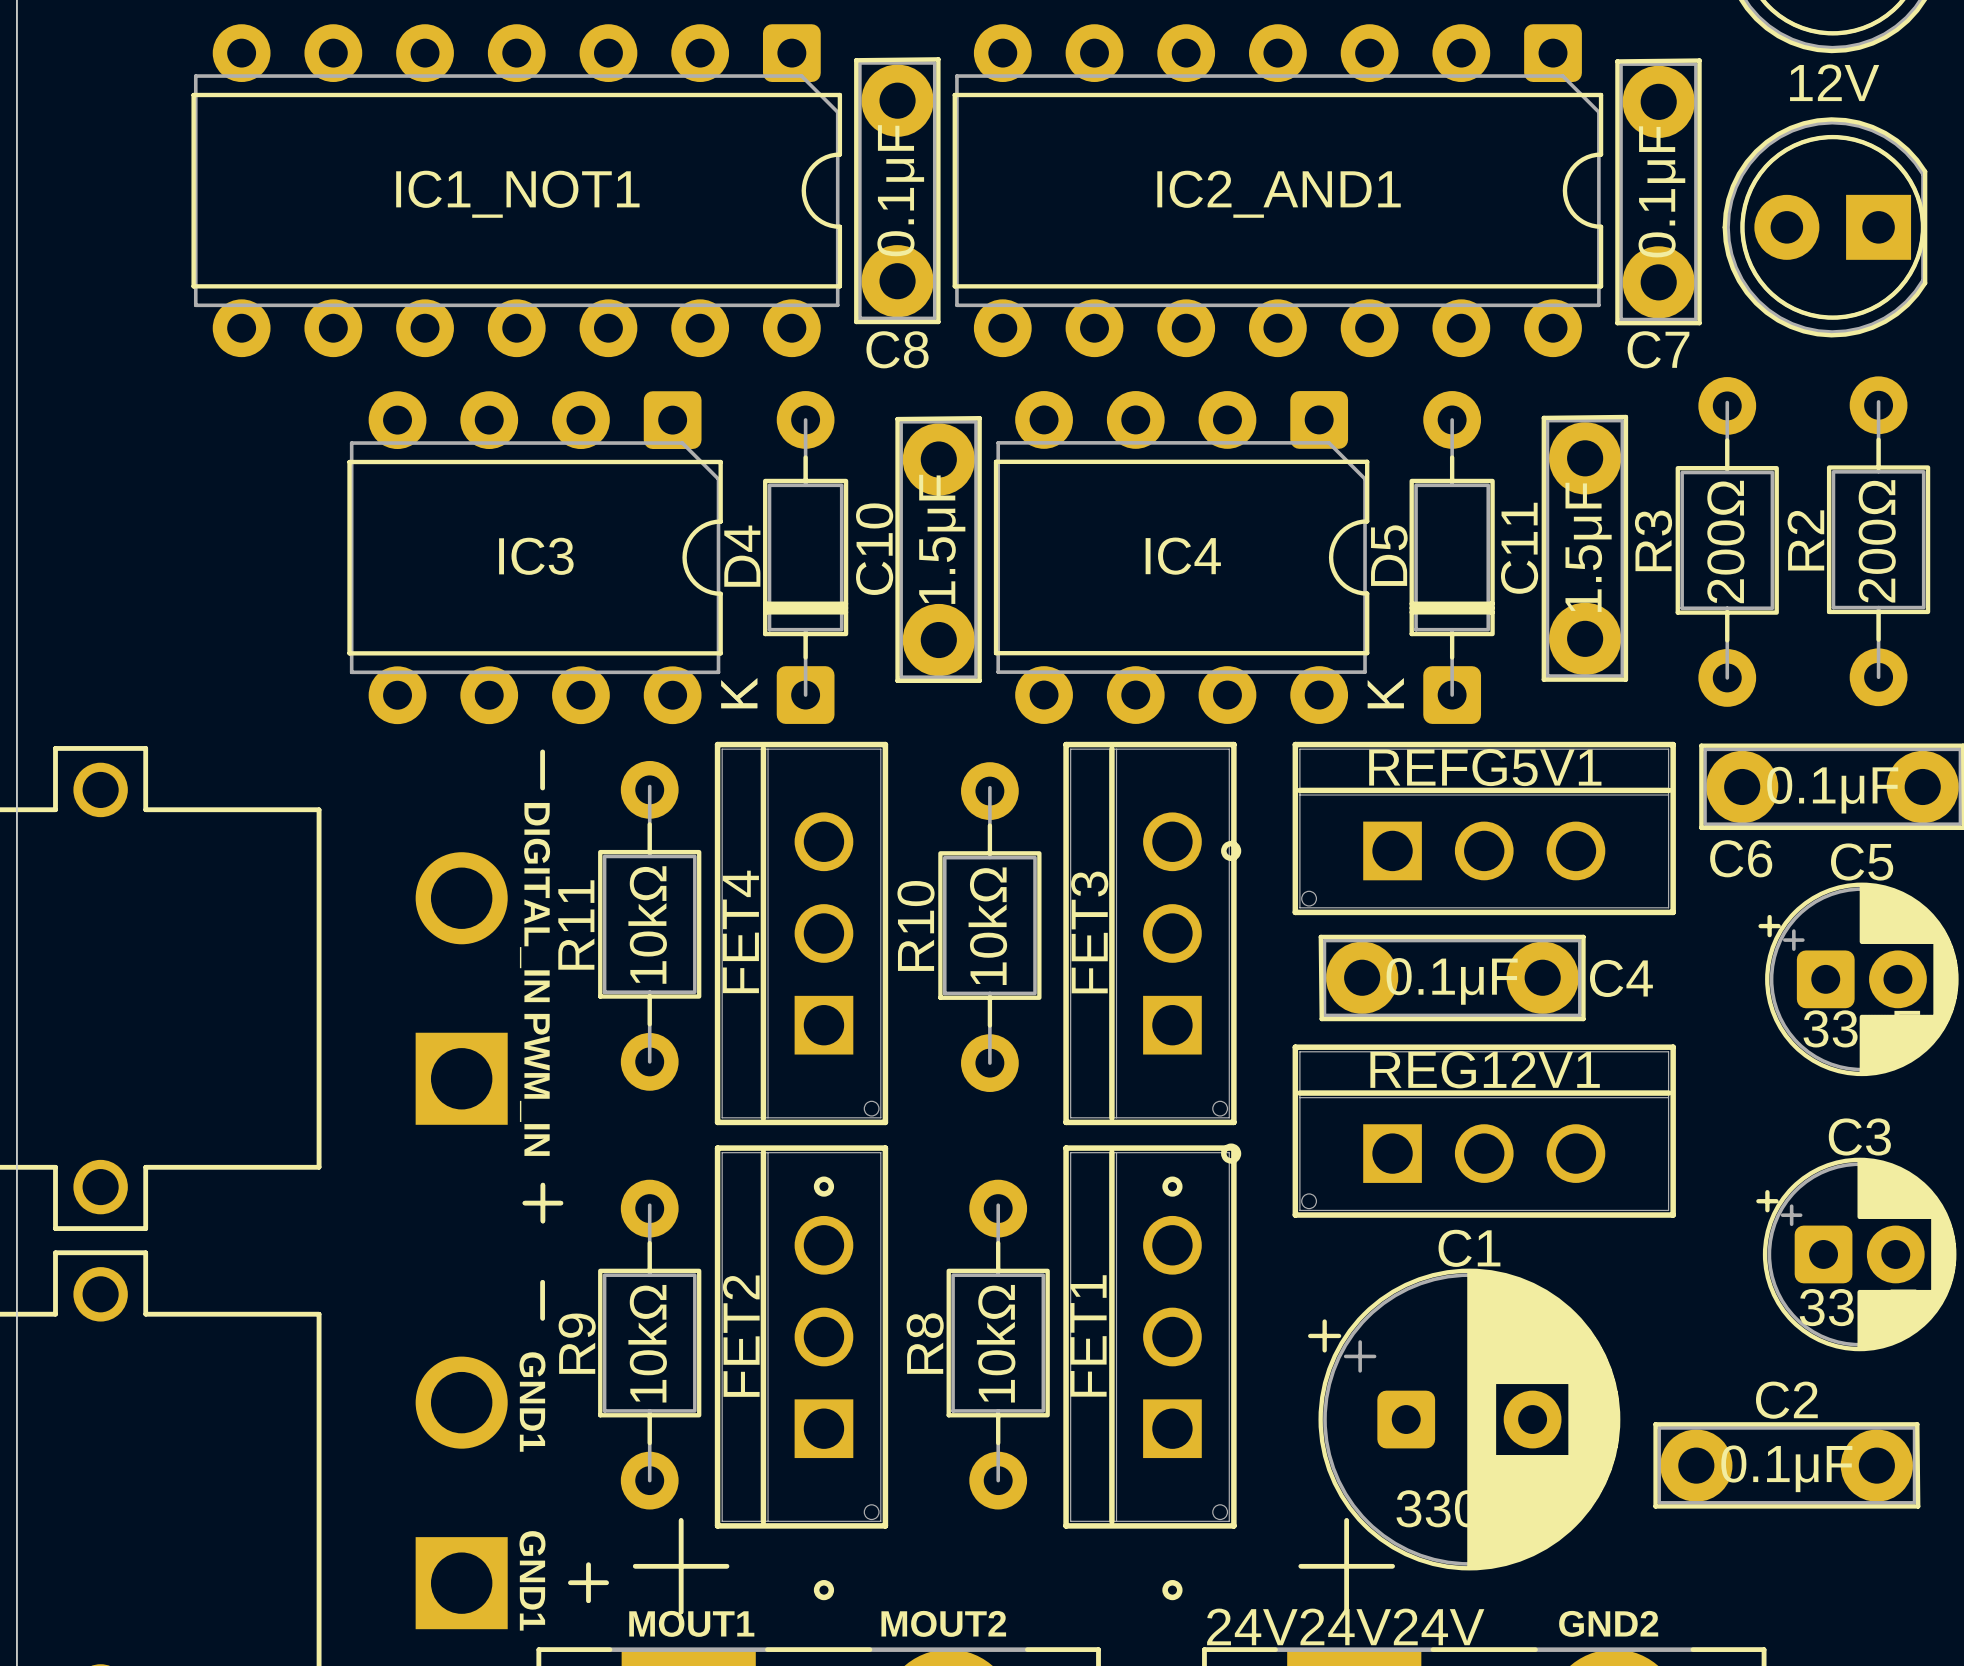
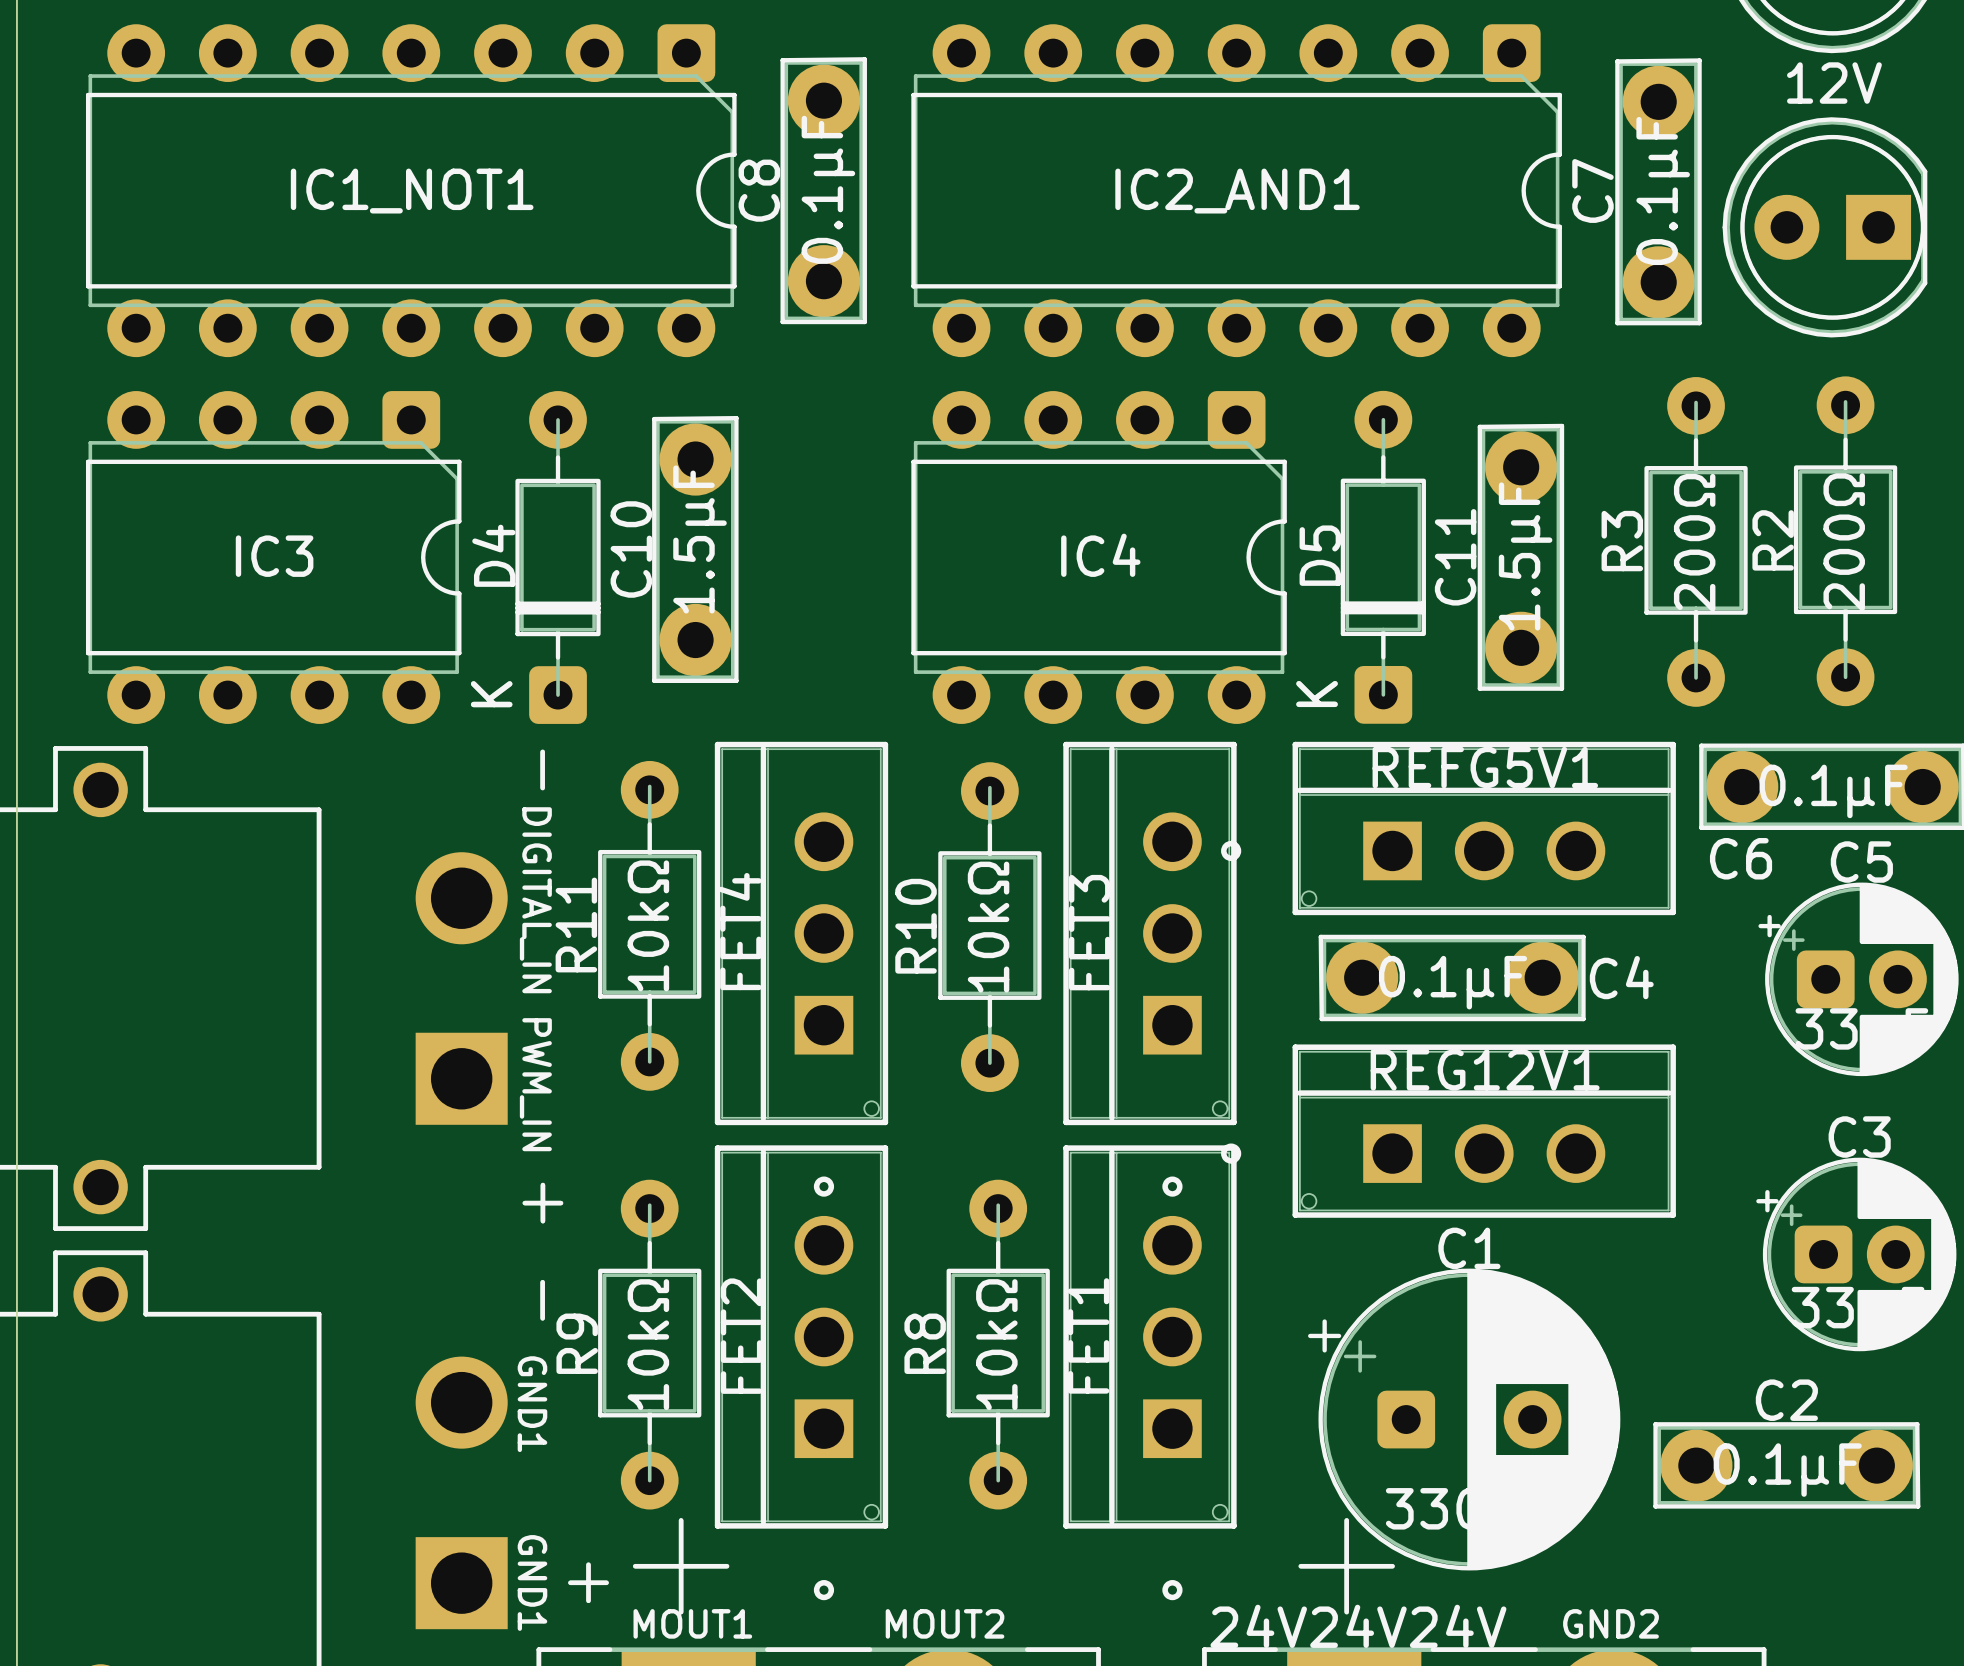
IC1_NOT1 position: (516, 190) -> (411, 190)
C8 position: (897, 190) -> (823, 190)
IC2_AND1 position: (1277, 190) -> (1236, 190)
C8 name rotation: 0° (897, 349) -> 90° counterclockwise (759, 190)
C8 name position: C8 (897, 349) -> C8 (759, 190)
C7 name rotation: 0° (1658, 349) -> 90° counterclockwise (1592, 190)
C7 name position: C7 (1658, 349) -> C7 (1592, 190)
R3 position: (1727, 541) -> (1696, 541)
R2 position: (1878, 541) -> (1845, 541)
C11 position: (1584, 548) -> (1520, 557)
C10 position: (938, 549) -> (695, 549)
IC3 position: (535, 557) -> (273, 557)
D4 position: (805, 557) -> (558, 557)
IC4 position: (1181, 557) -> (1099, 557)
D5 position: (1452, 557) -> (1383, 557)

